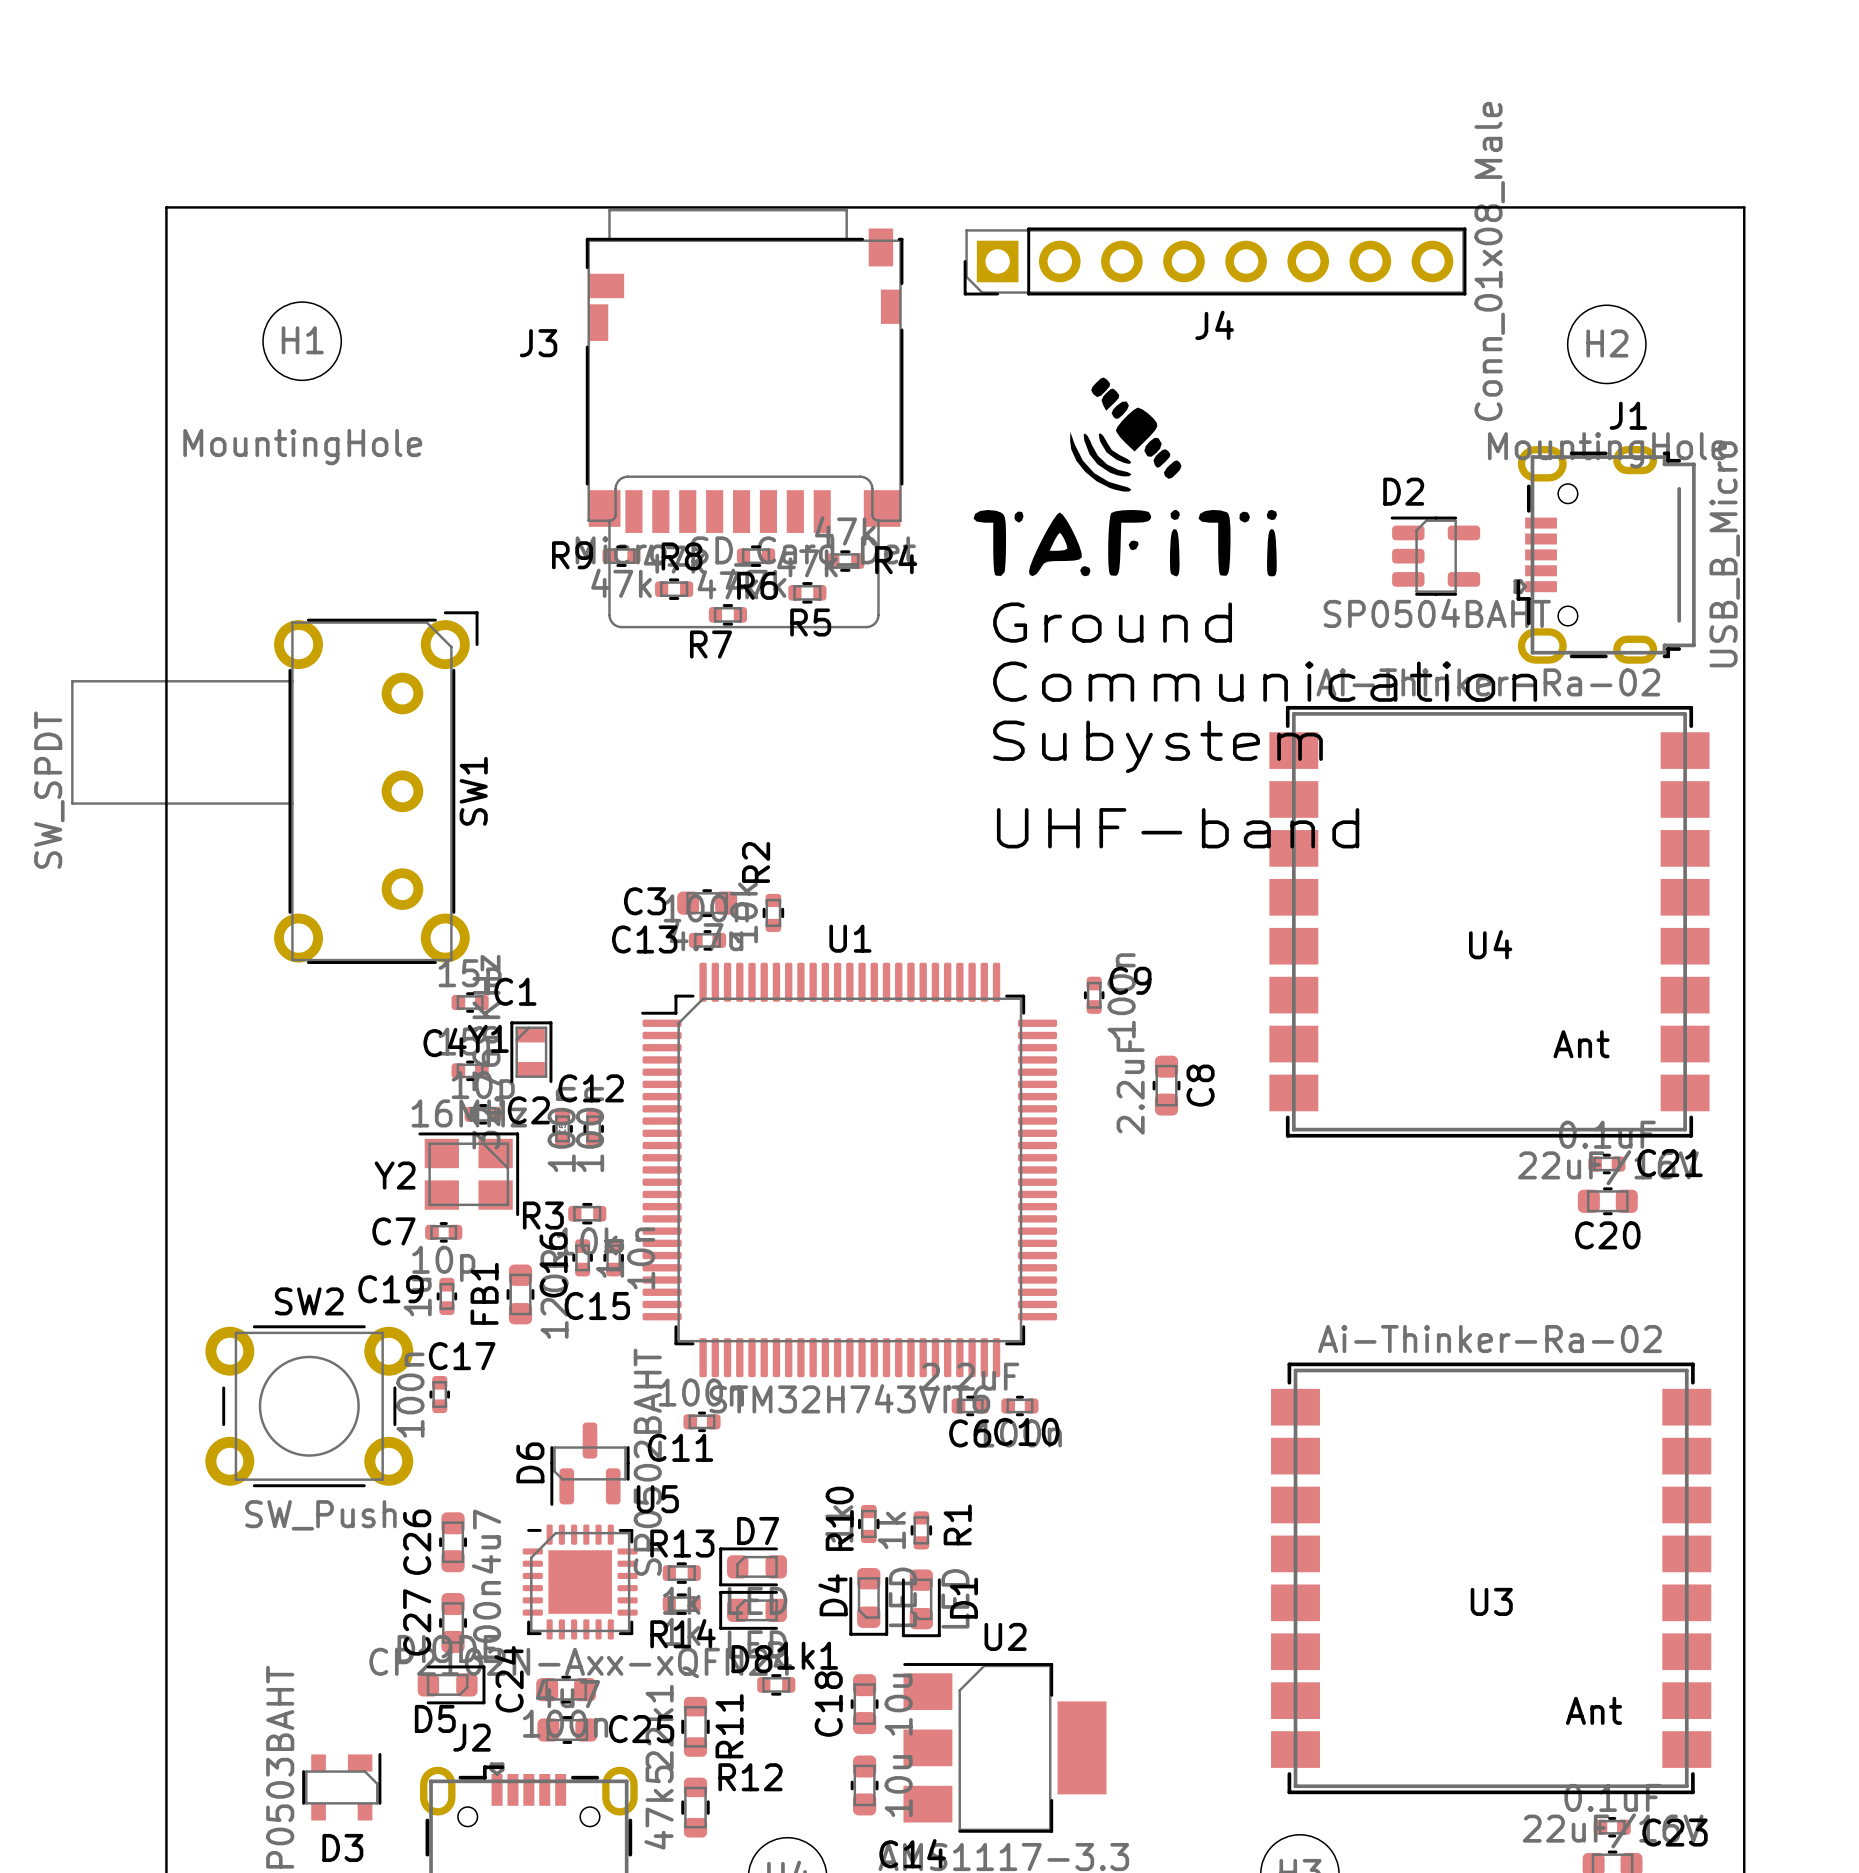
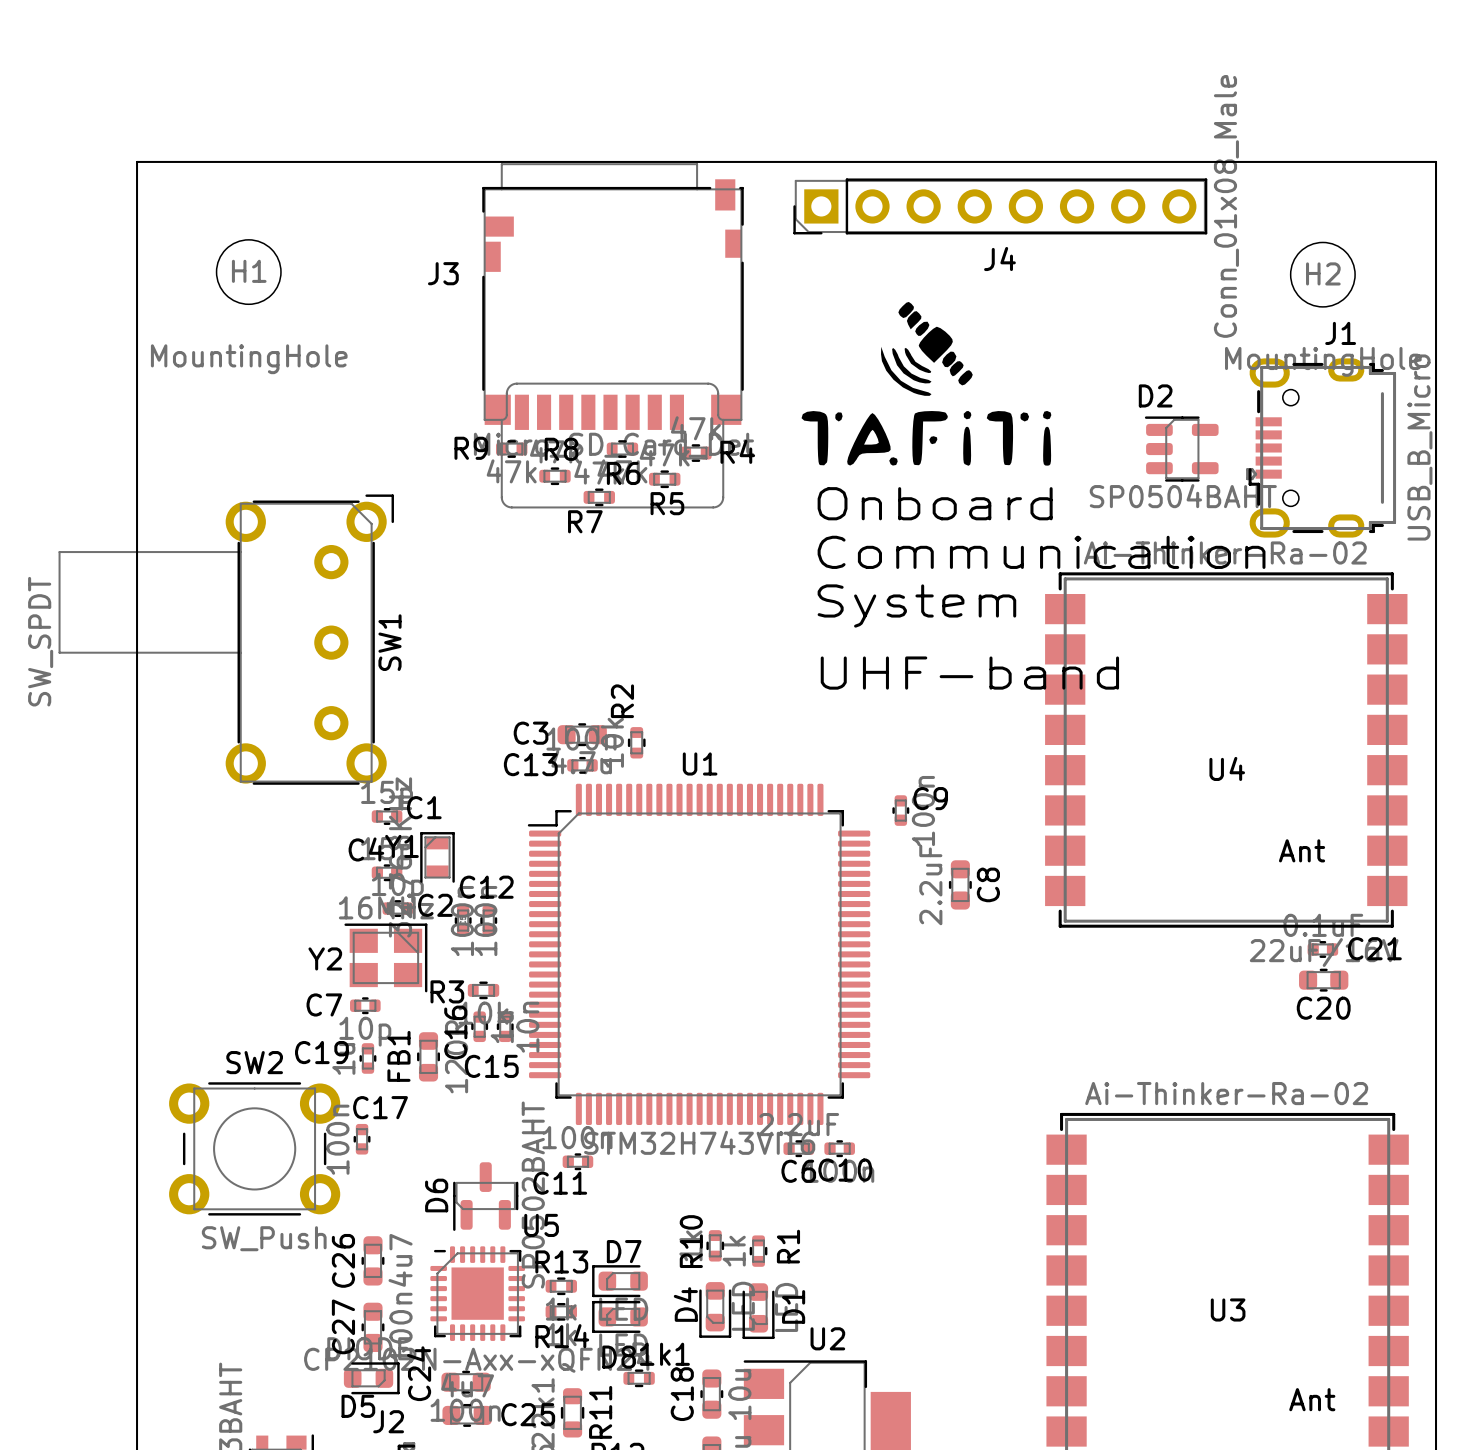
text: Ground (1112, 622) -> Onboard (935, 503)
text: Subystem (1157, 746) -> System (916, 606)

